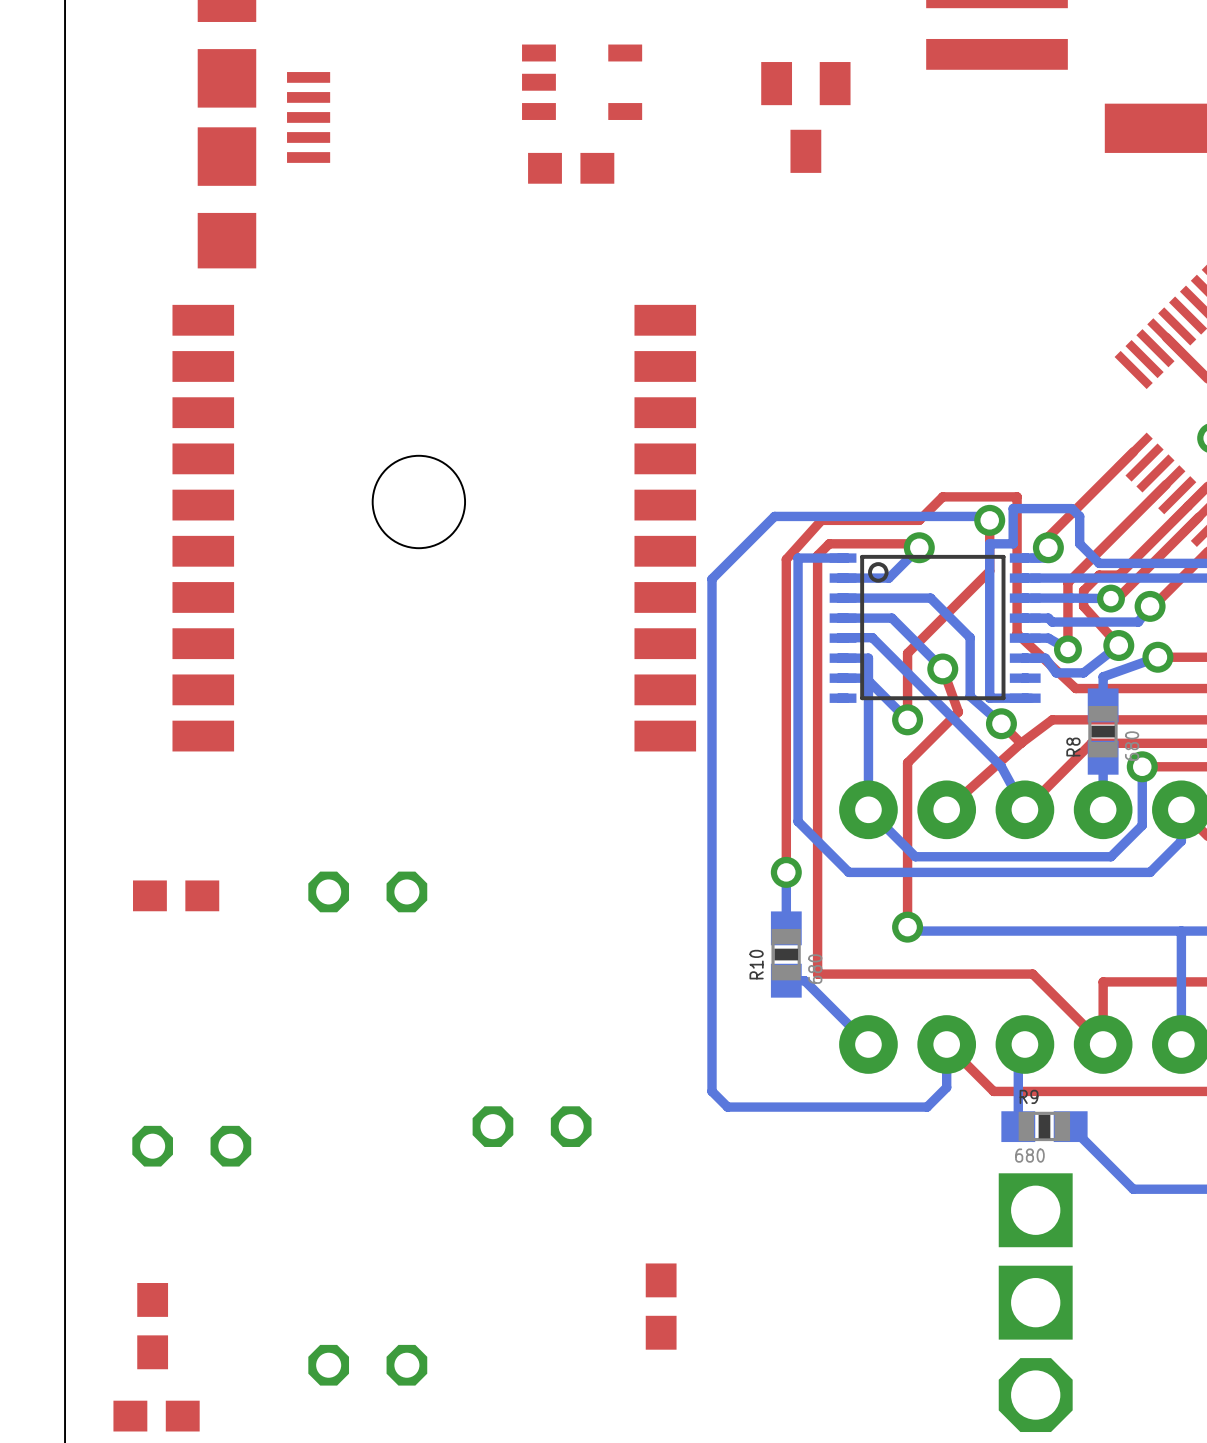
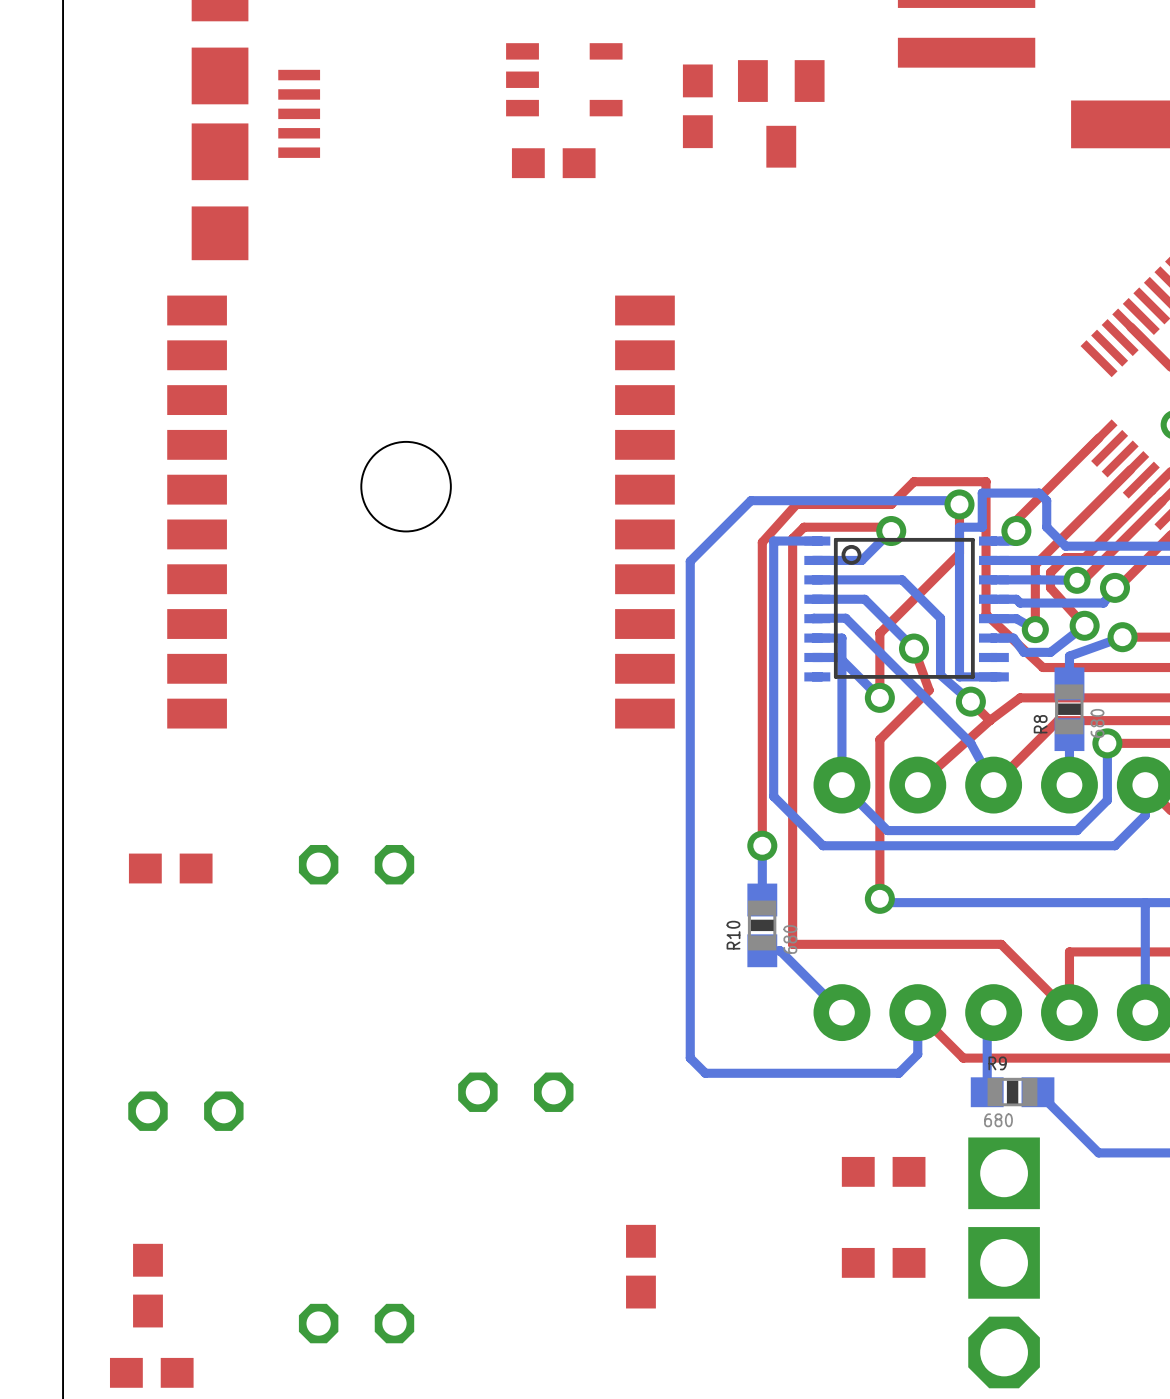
part: none -> (697, 106)
part: none -> (883, 1171)
part: none -> (883, 1262)

